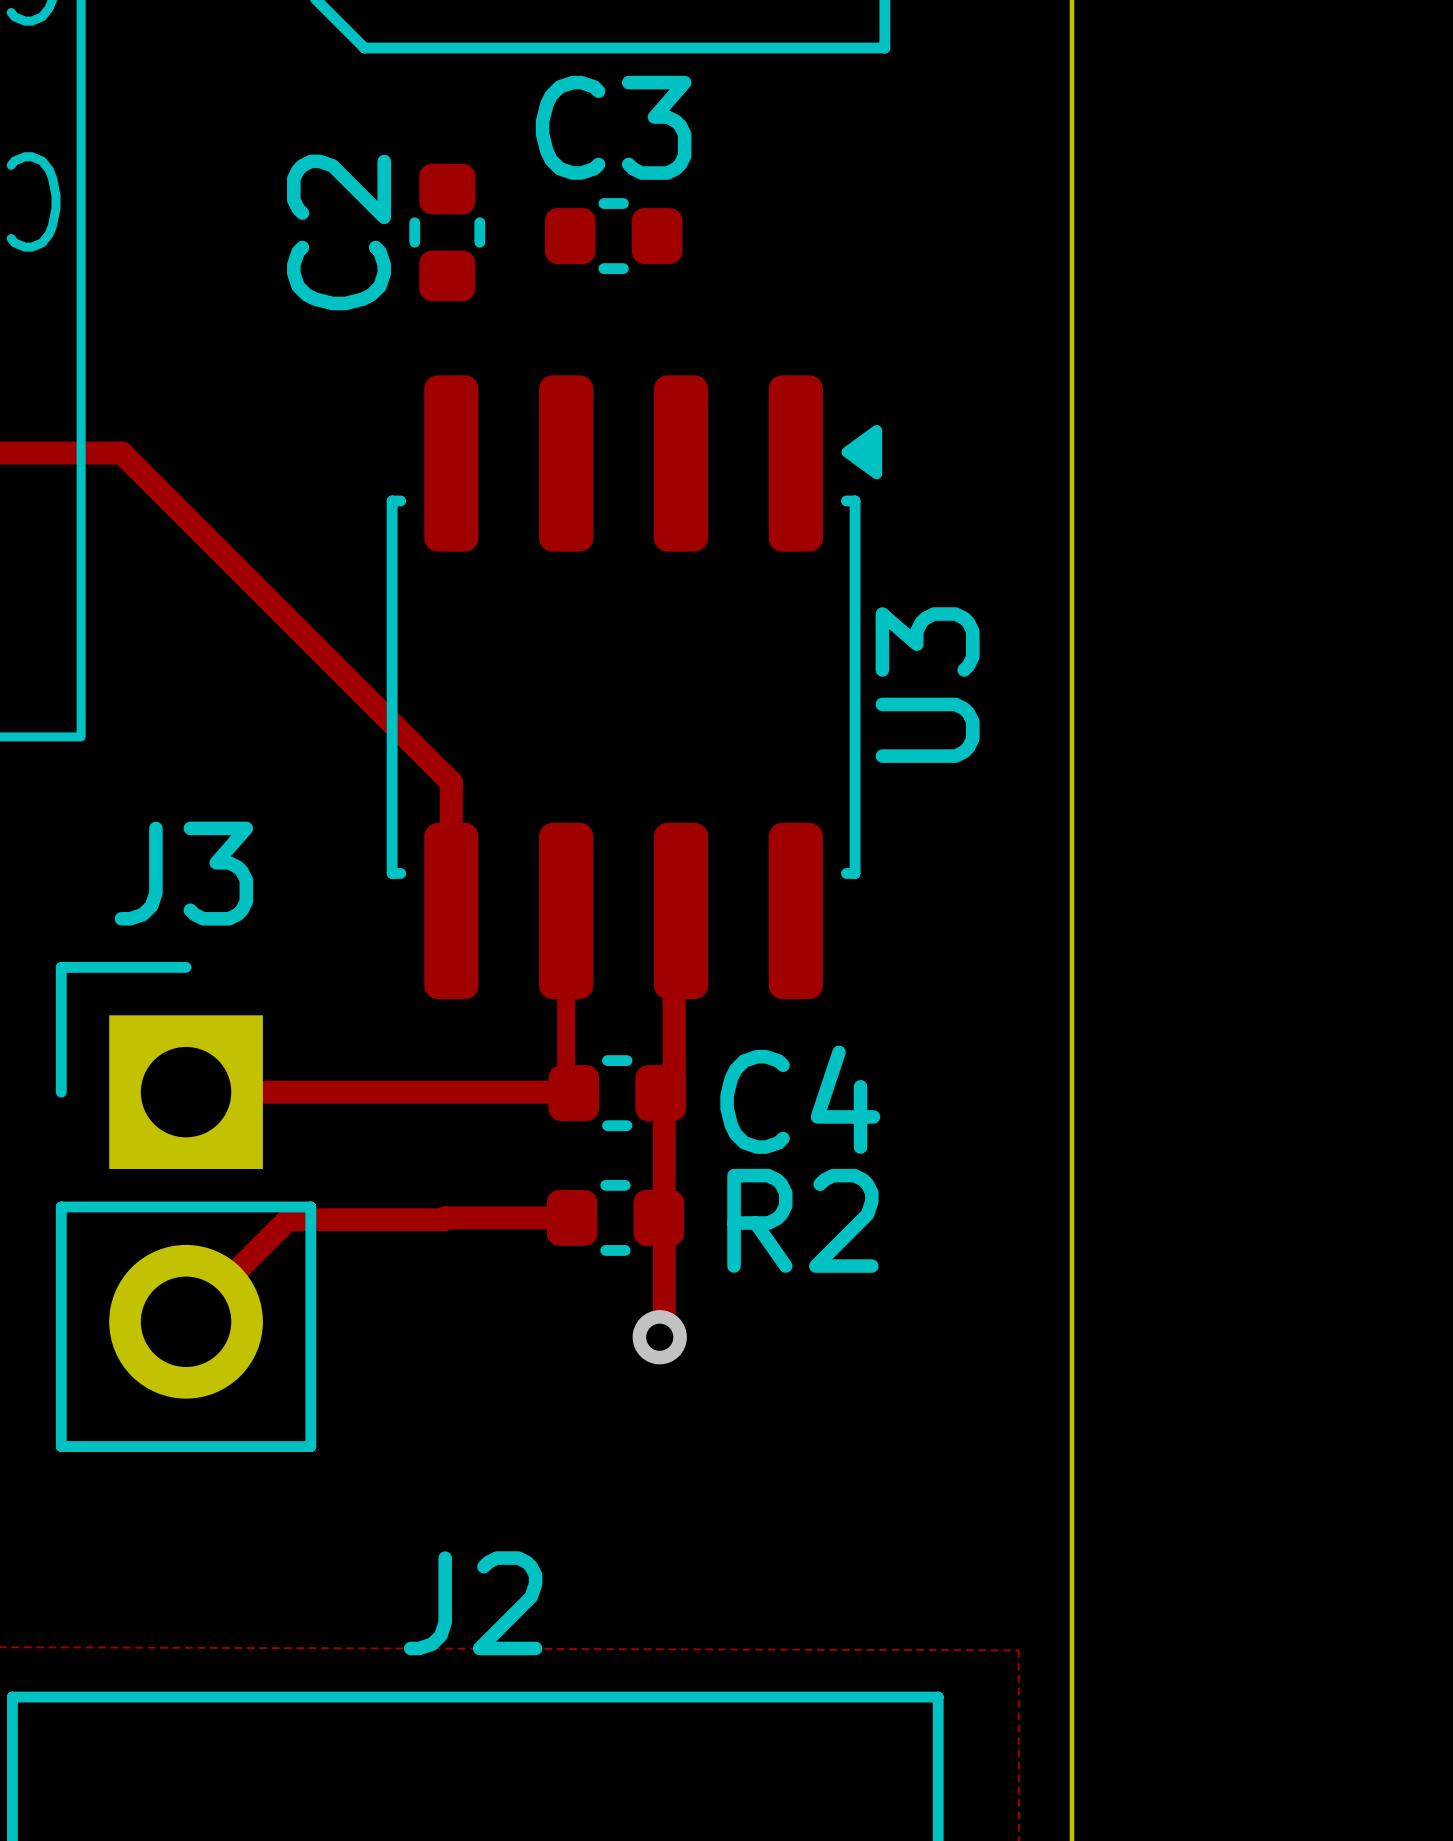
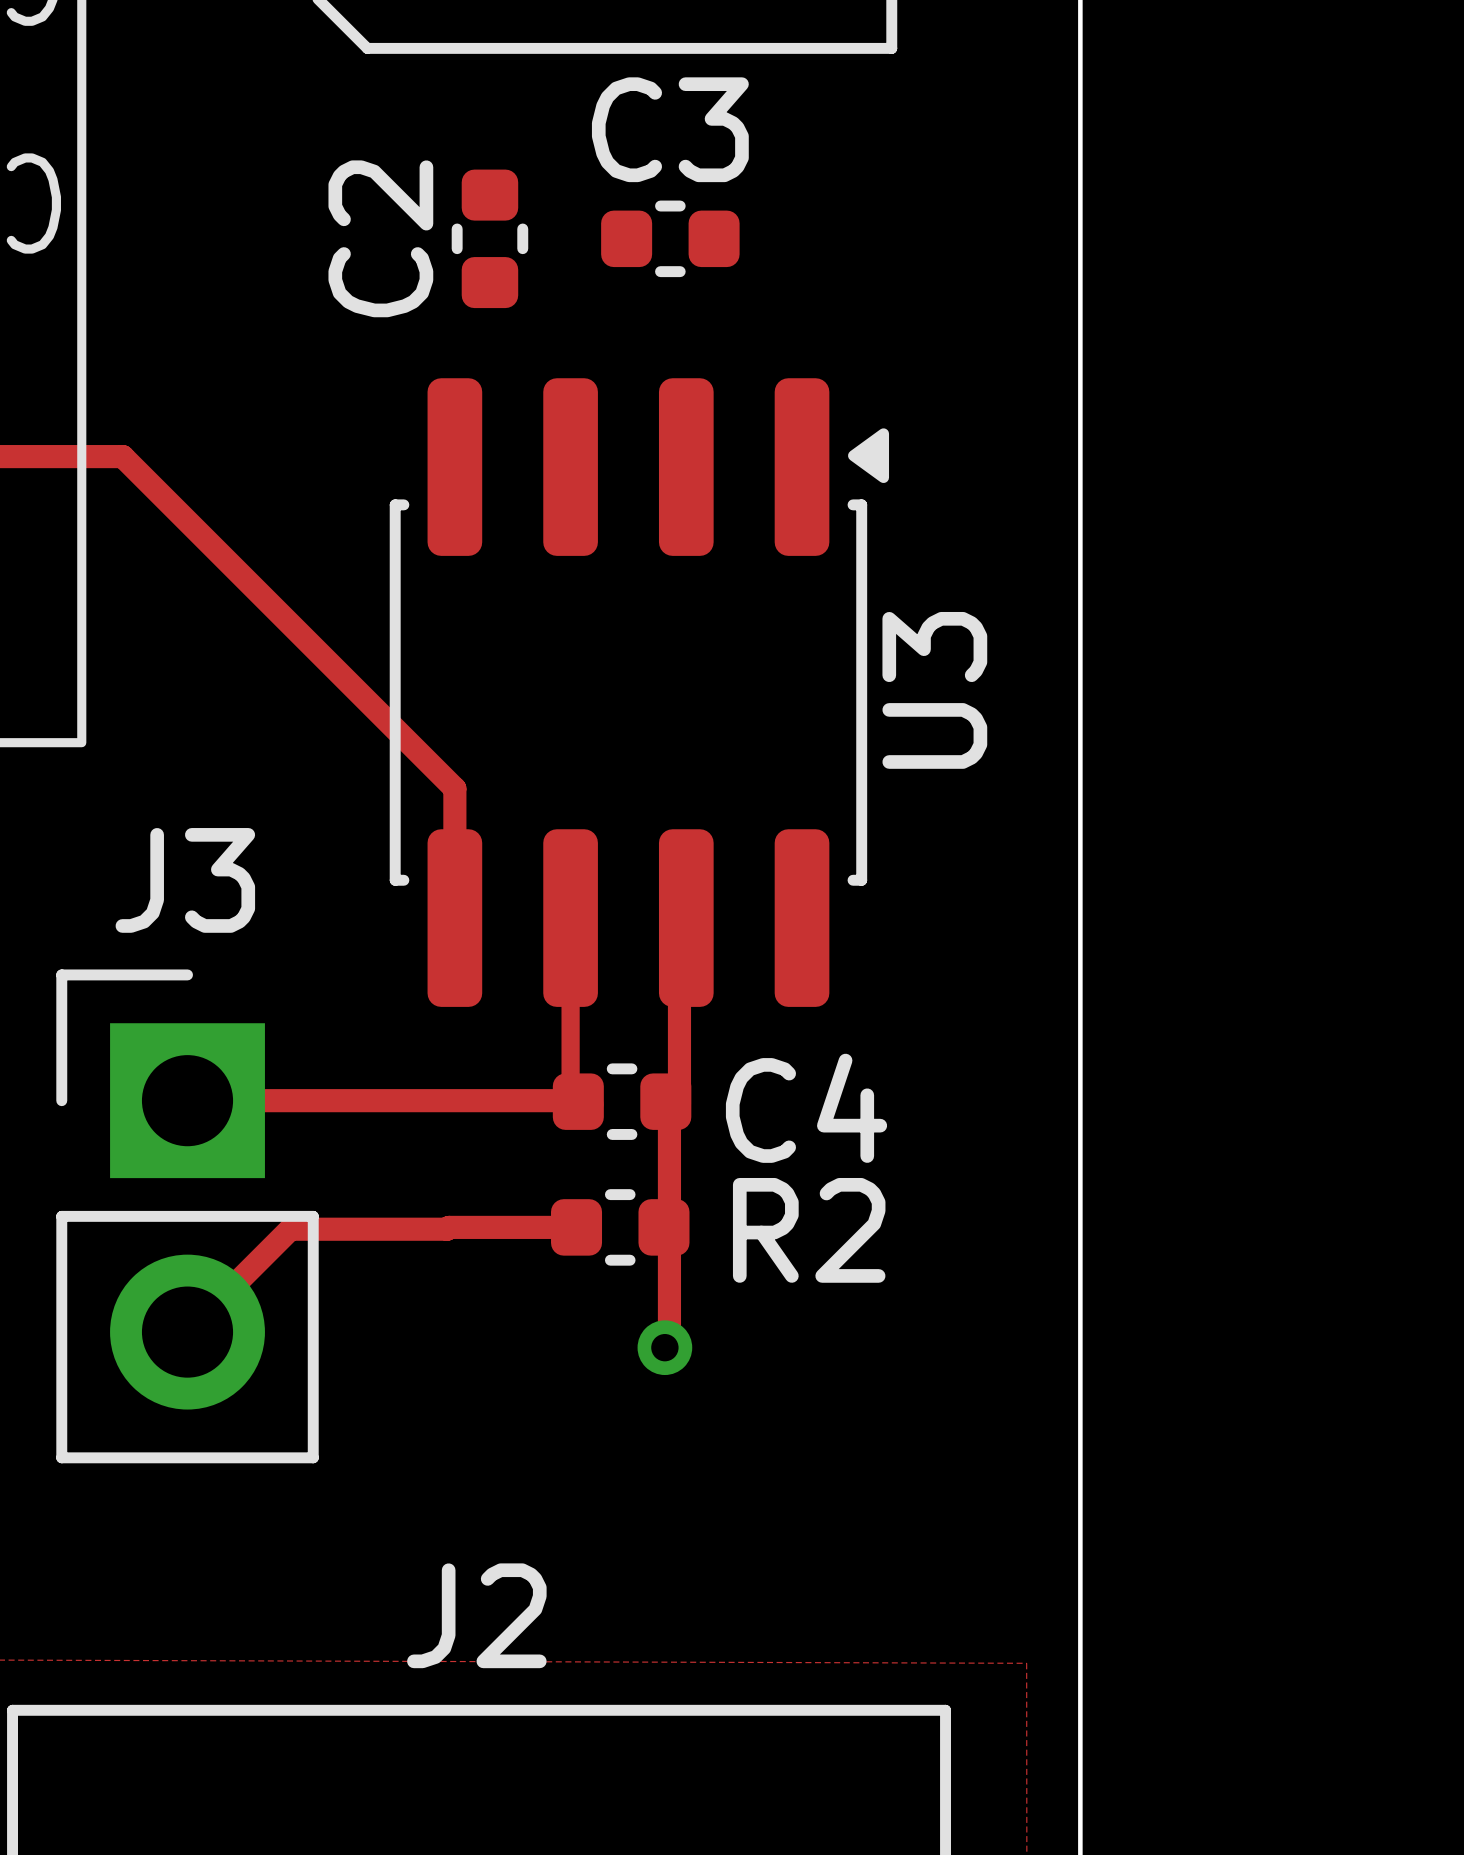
C2 position: (447, 232) -> (489, 238)
C3 position: (613, 236) -> (670, 238)

